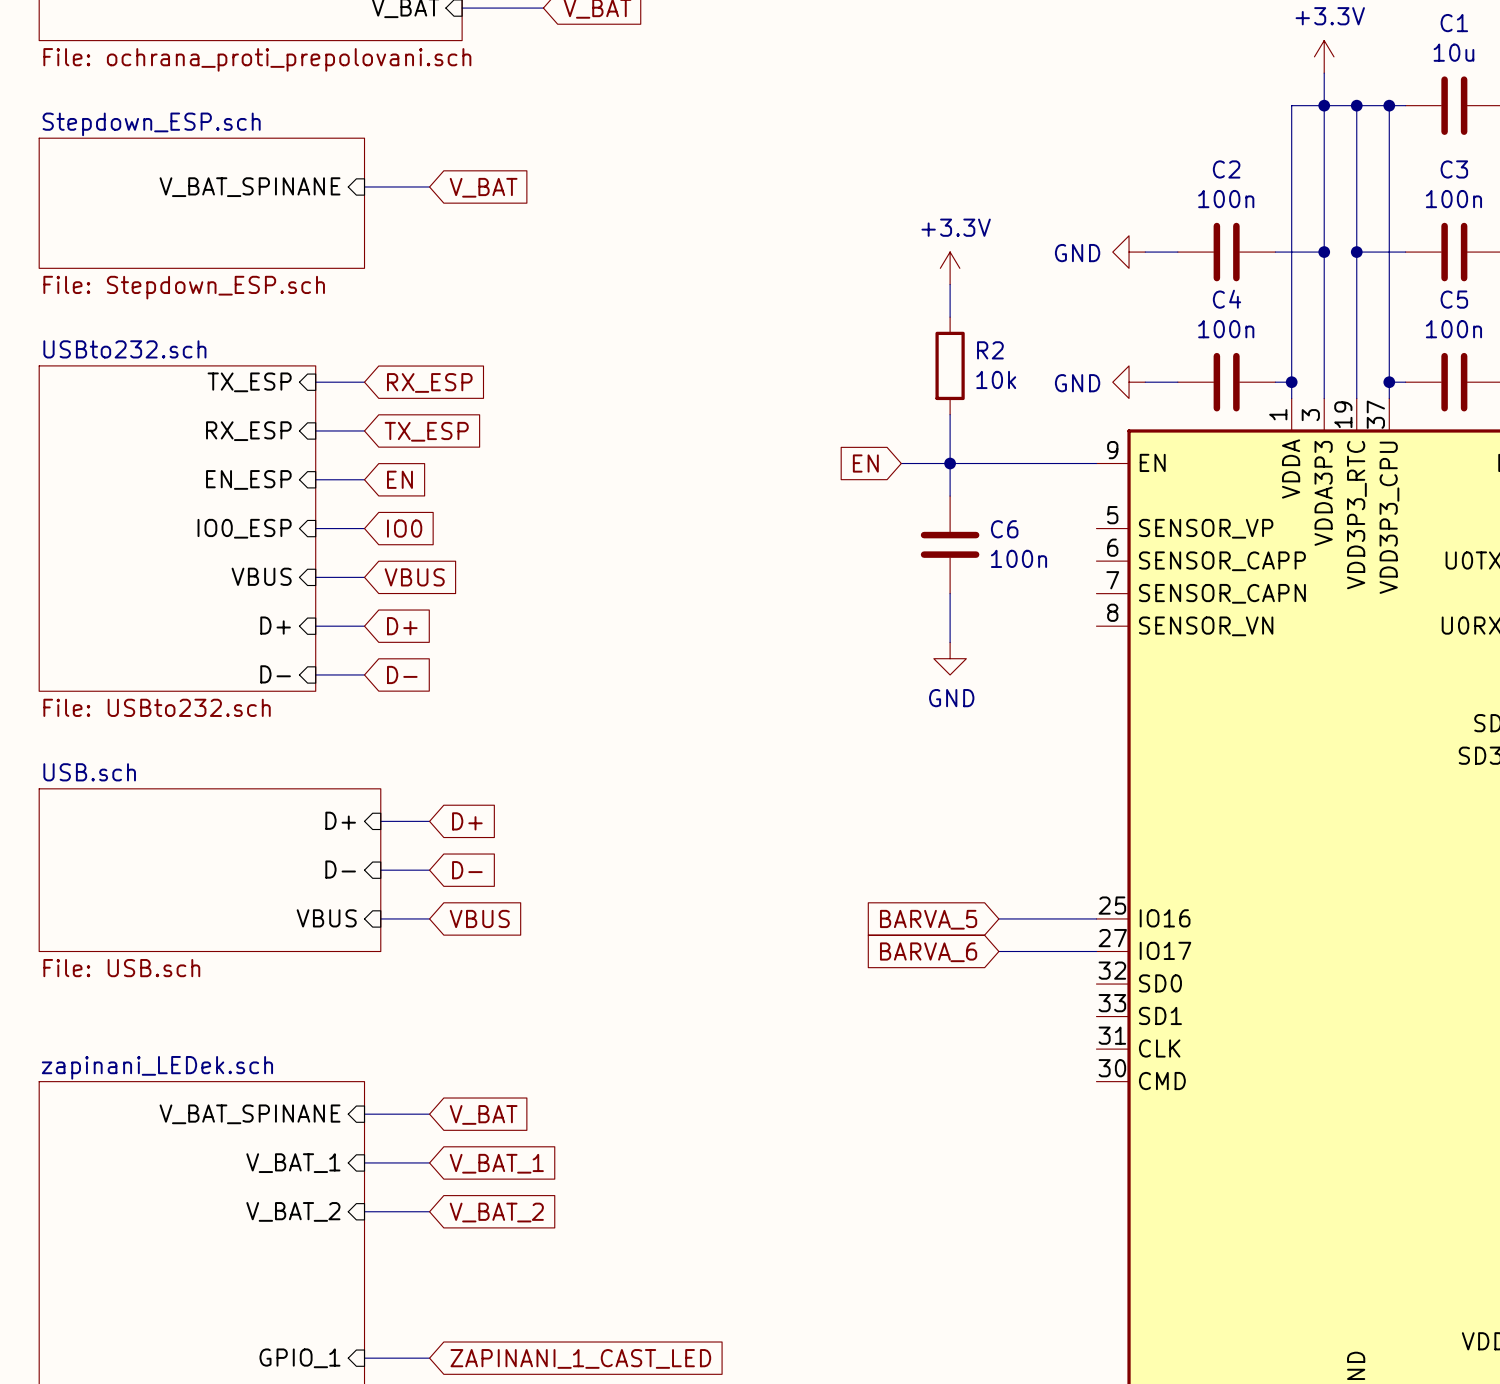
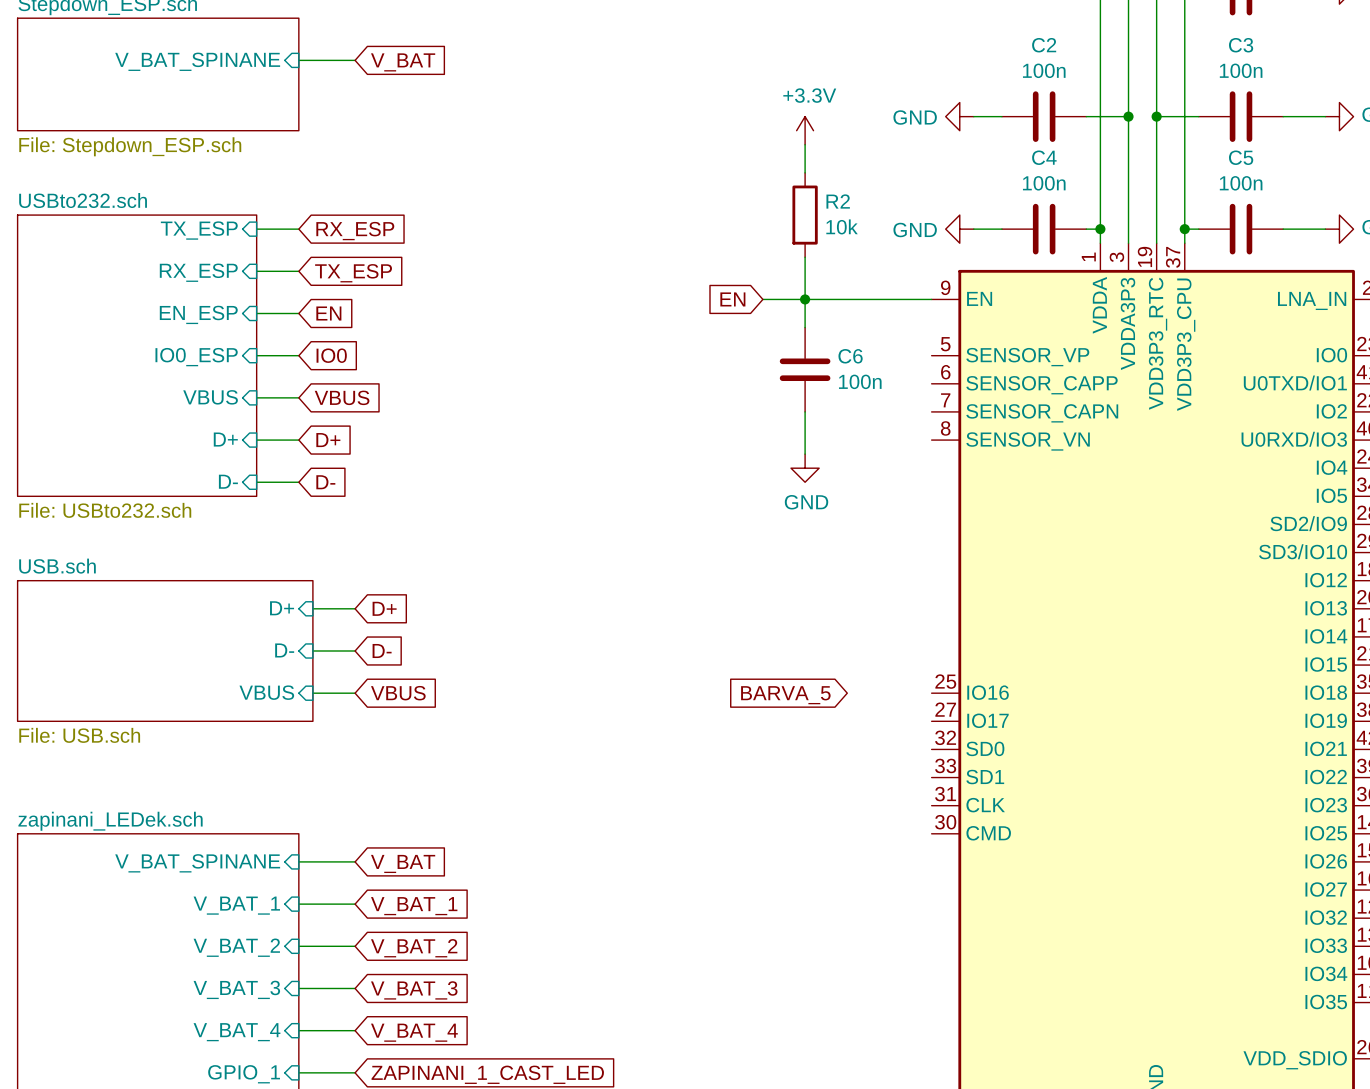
wire: (998, 918) (1096, 918) -> none
wire: (998, 951) (1096, 951) -> none
global label: BARVA_6 (928, 952) -> none
sheet pin: none -> V_BAT_3 (236, 989)
wire: none -> (298, 988) (355, 988)
global label: none -> V_BAT_3 (414, 990)
sheet pin: none -> V_BAT_4 (236, 1032)
wire: none -> (298, 1030) (355, 1030)
global label: none -> V_BAT_4 (414, 1032)

